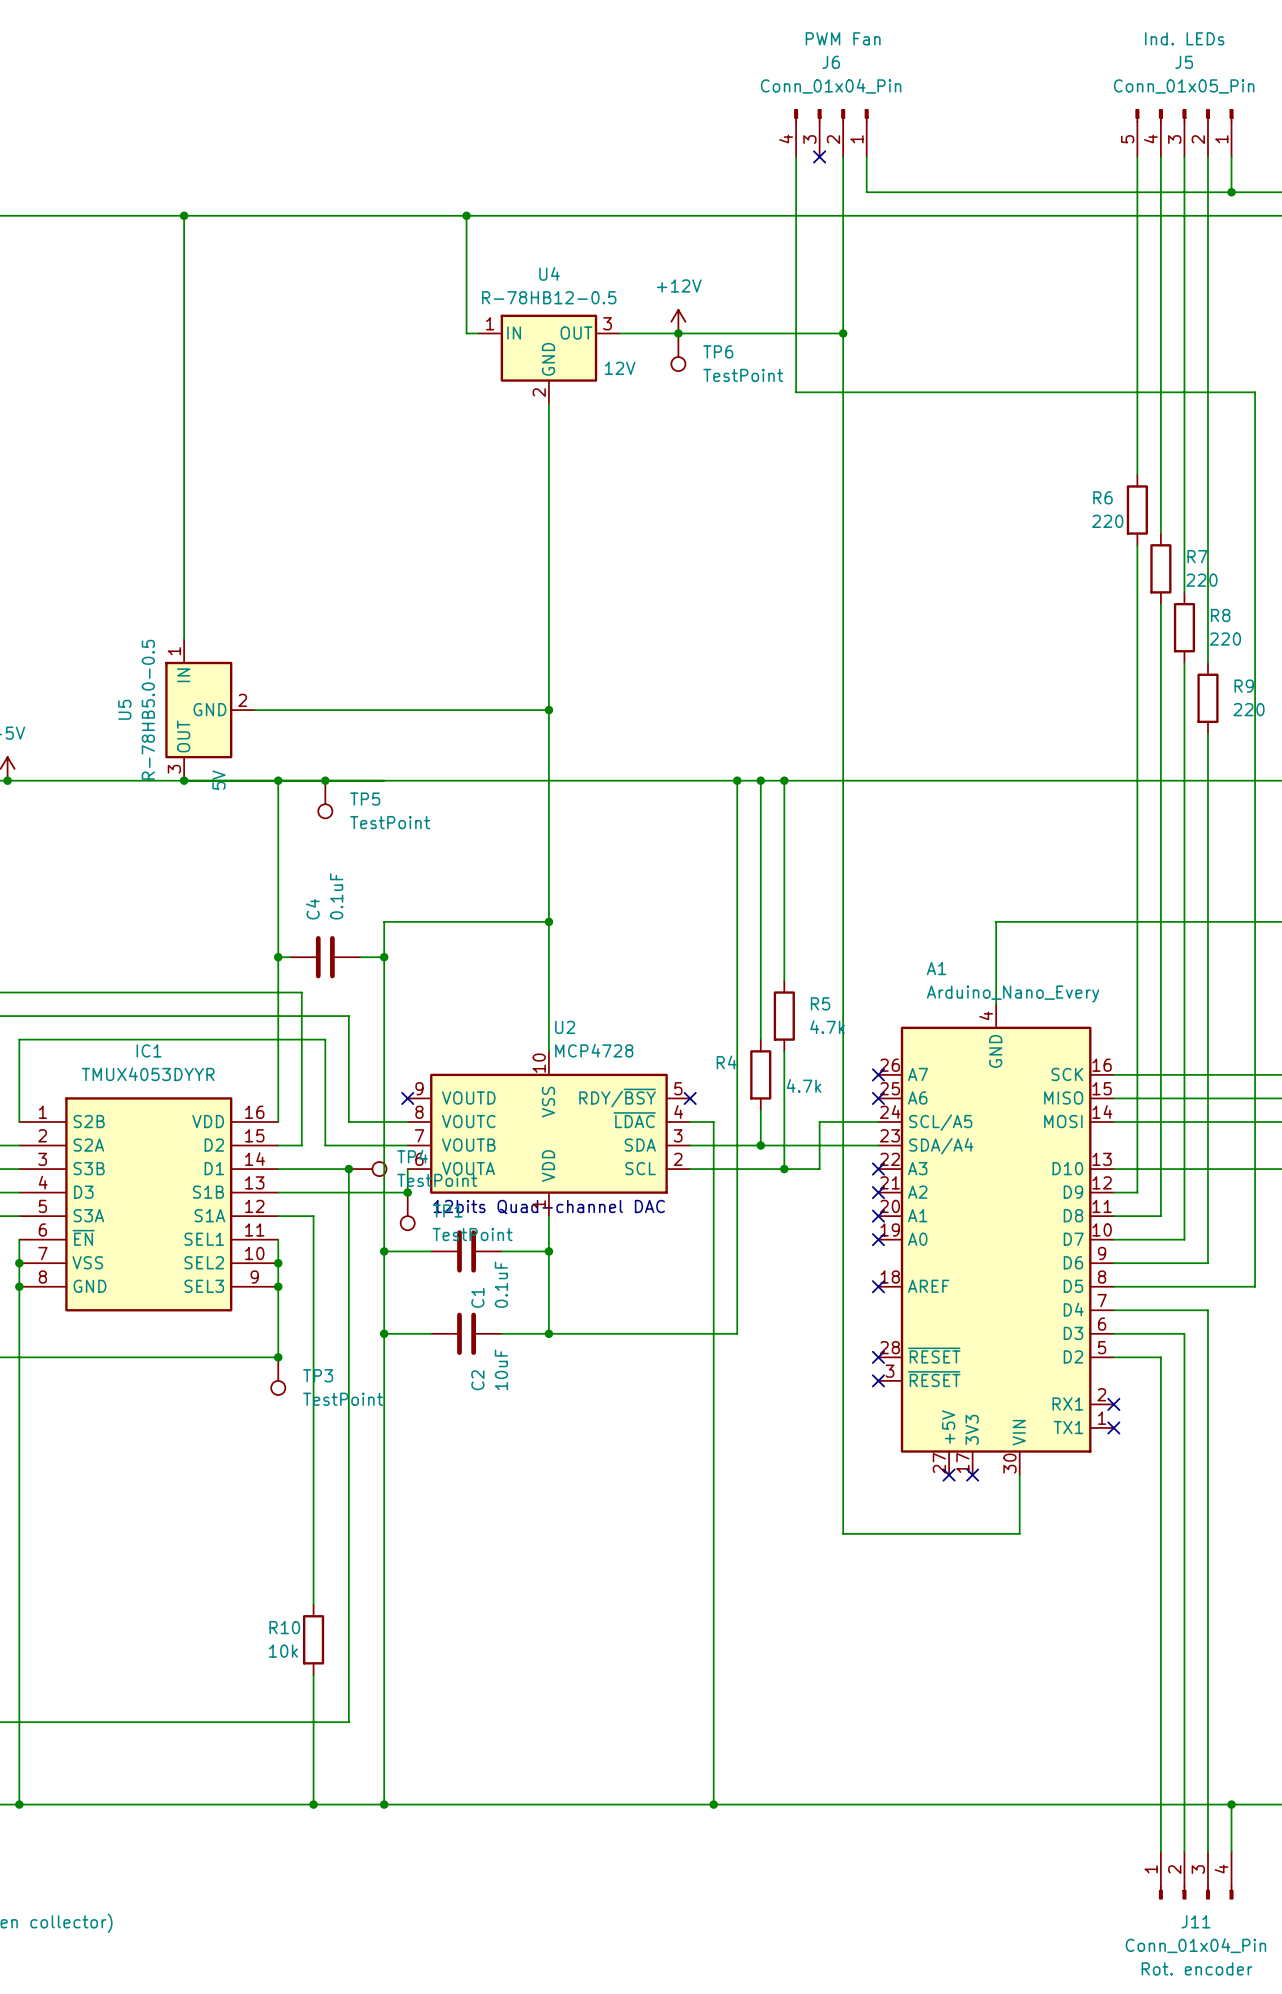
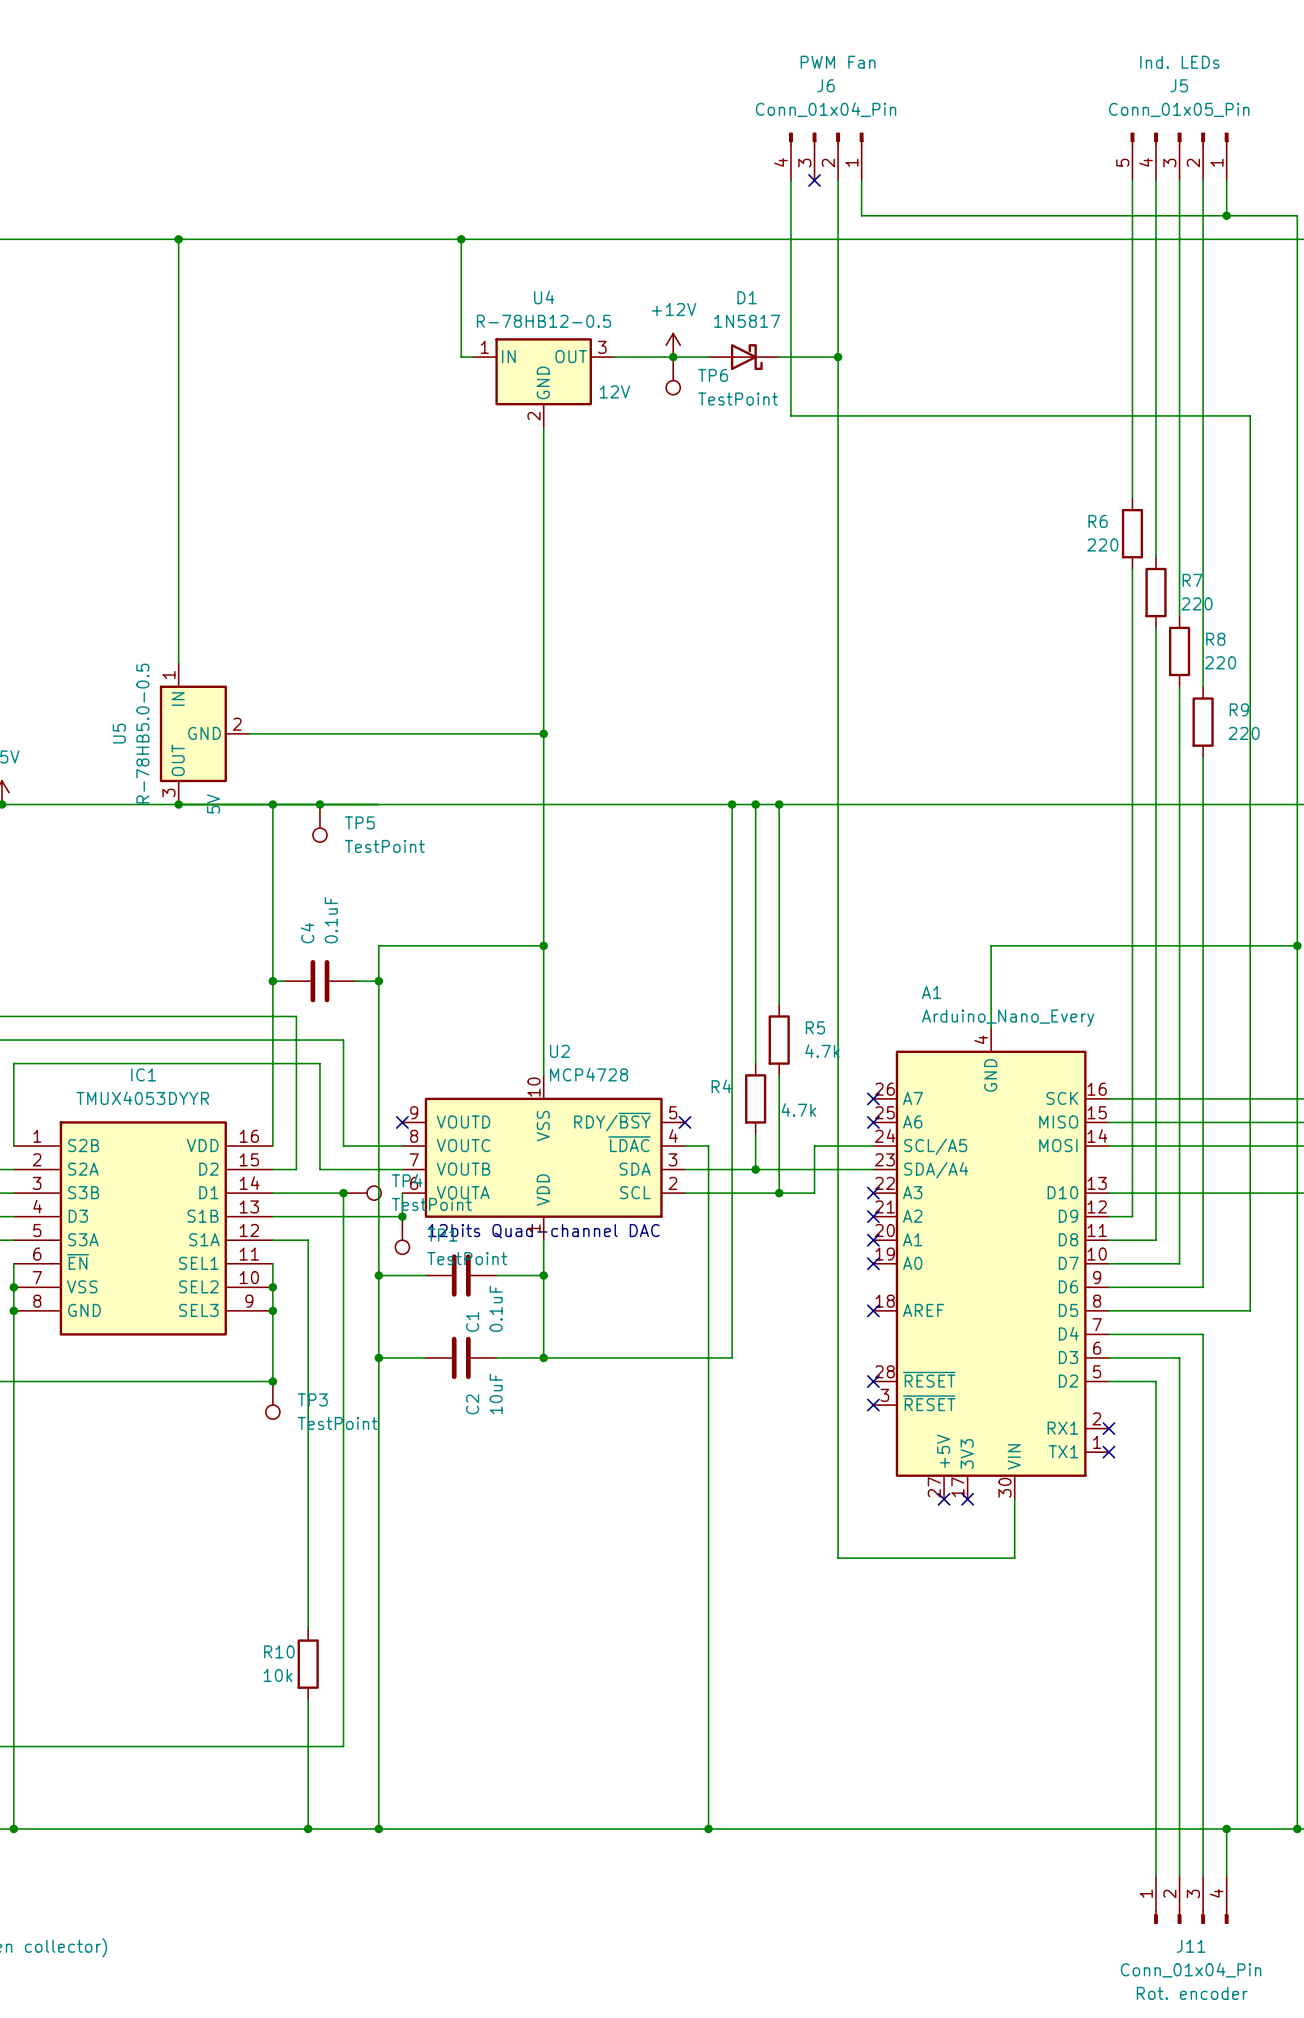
D1: none -> 1N5817 (743, 357)

